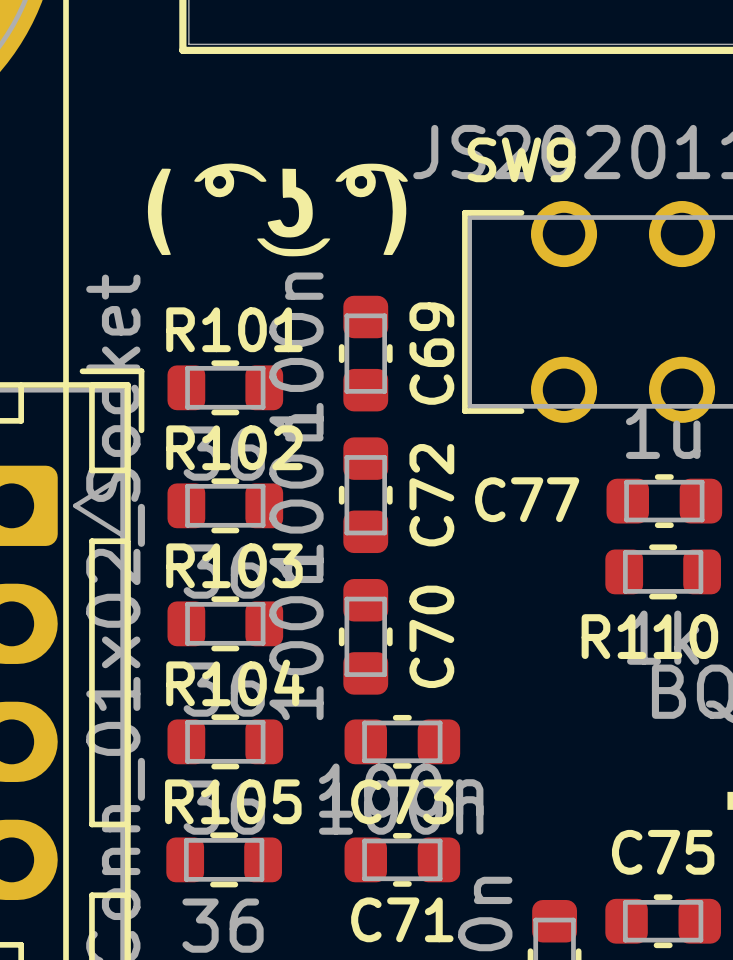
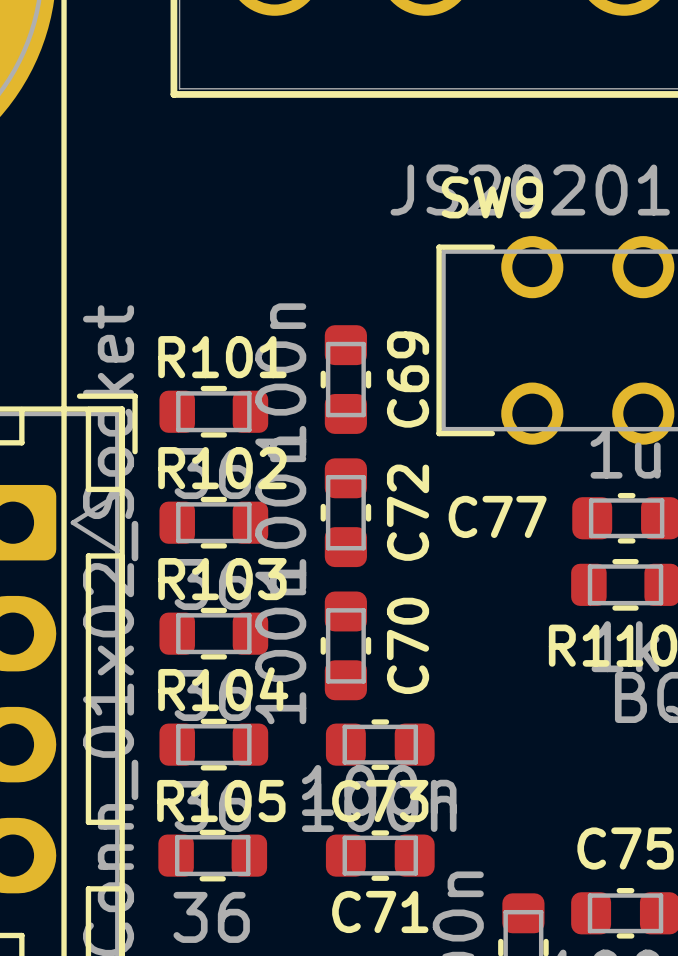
drawing: [147, 163, 408, 257] -> none

